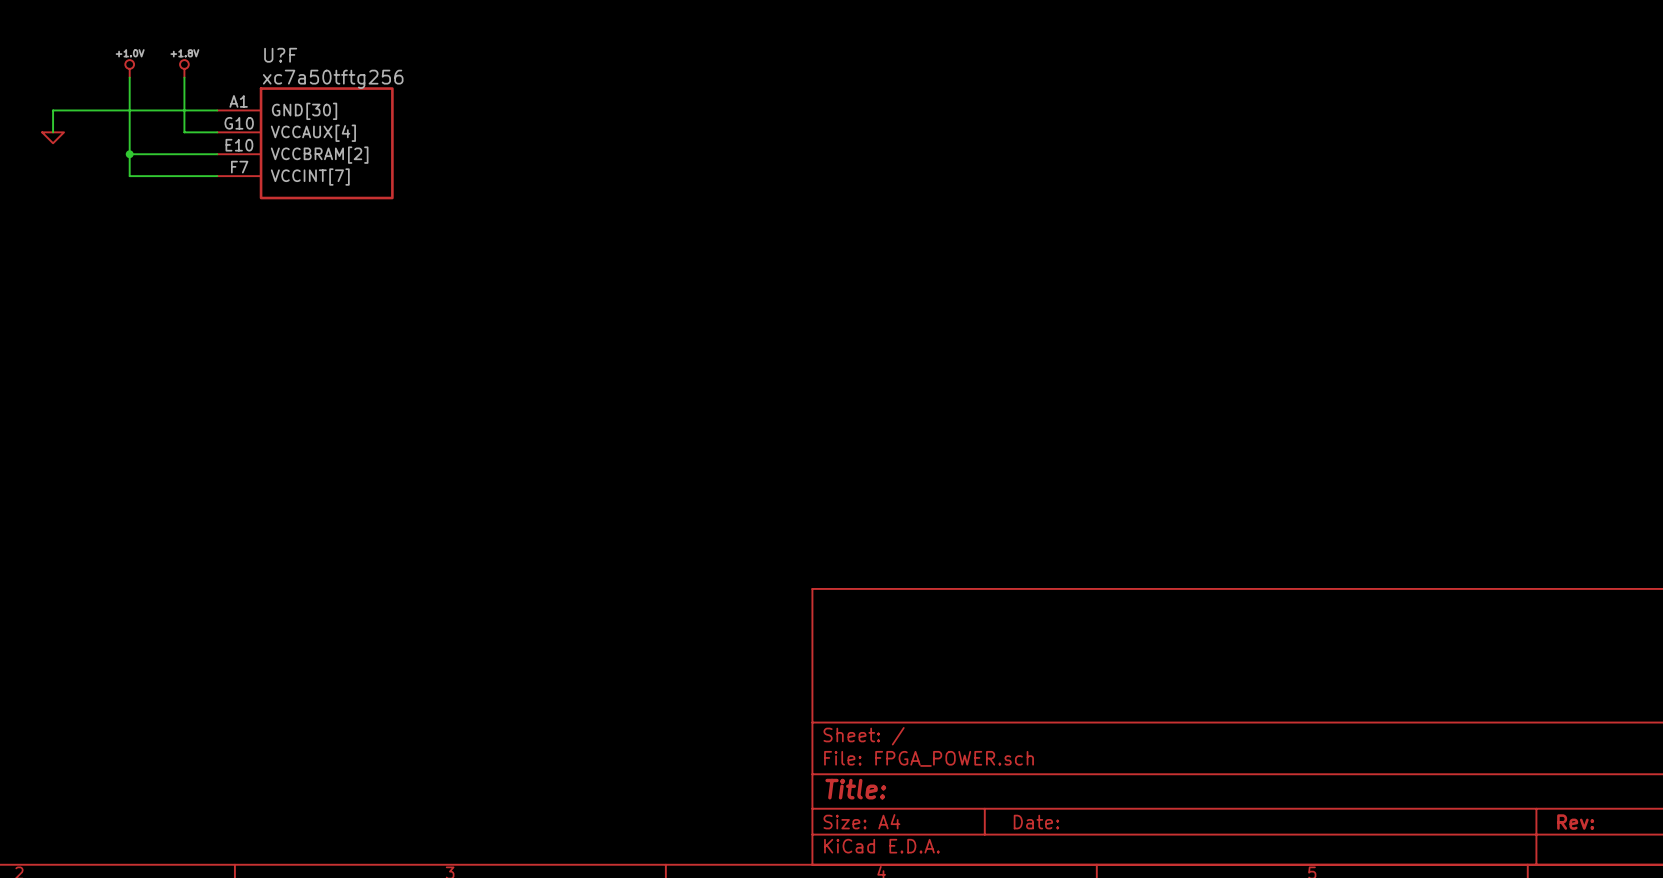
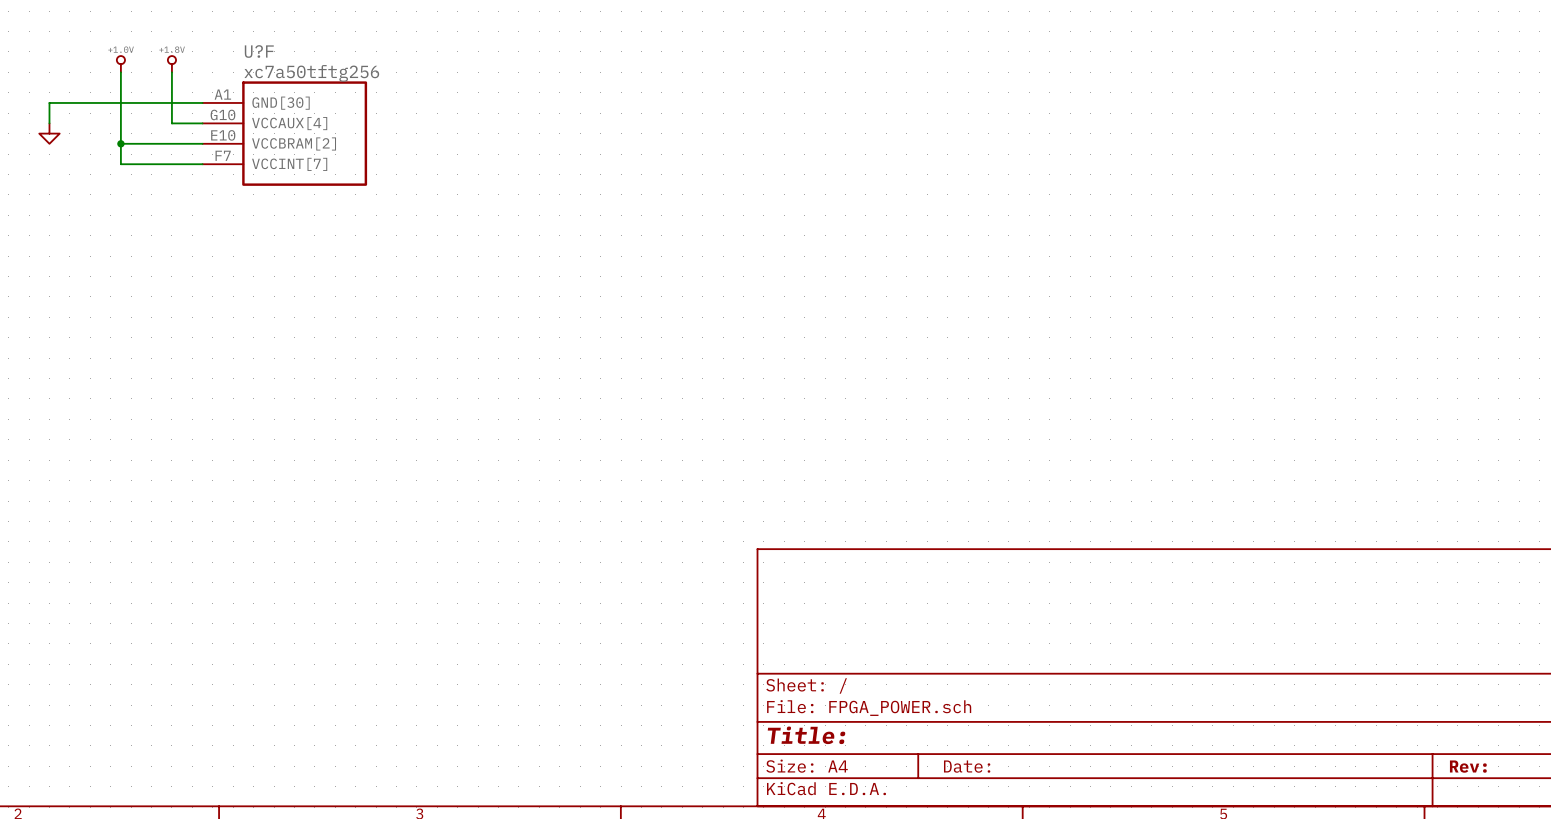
power symbol shape: [42, 132, 65, 144] -> [39, 123, 60, 144]

